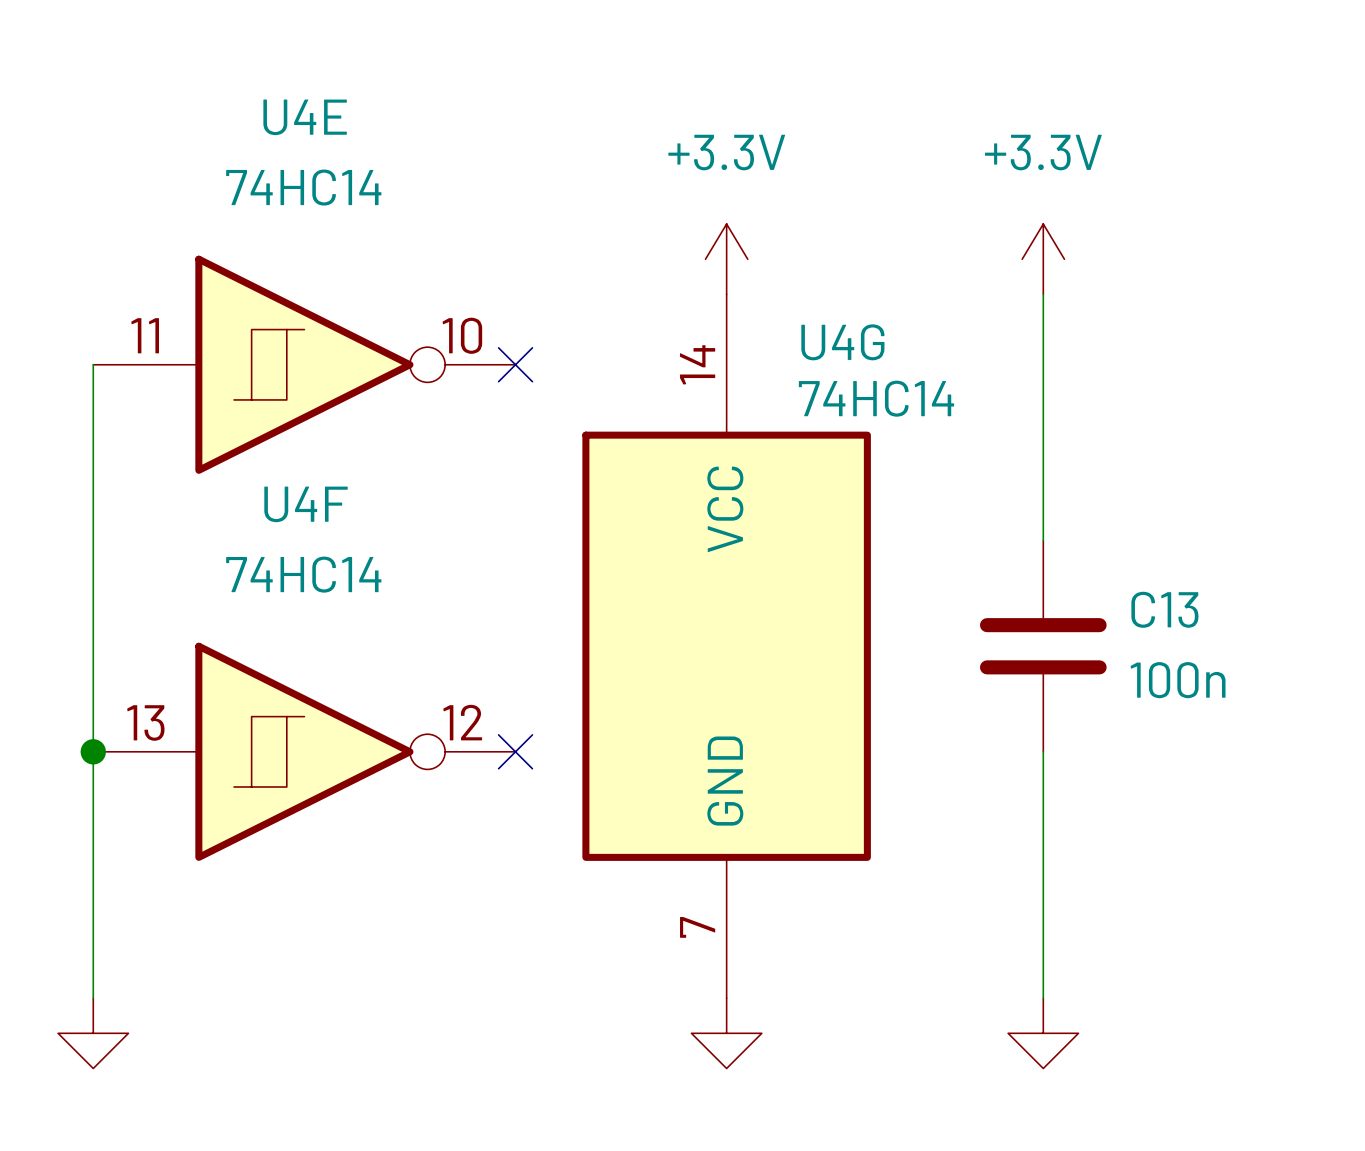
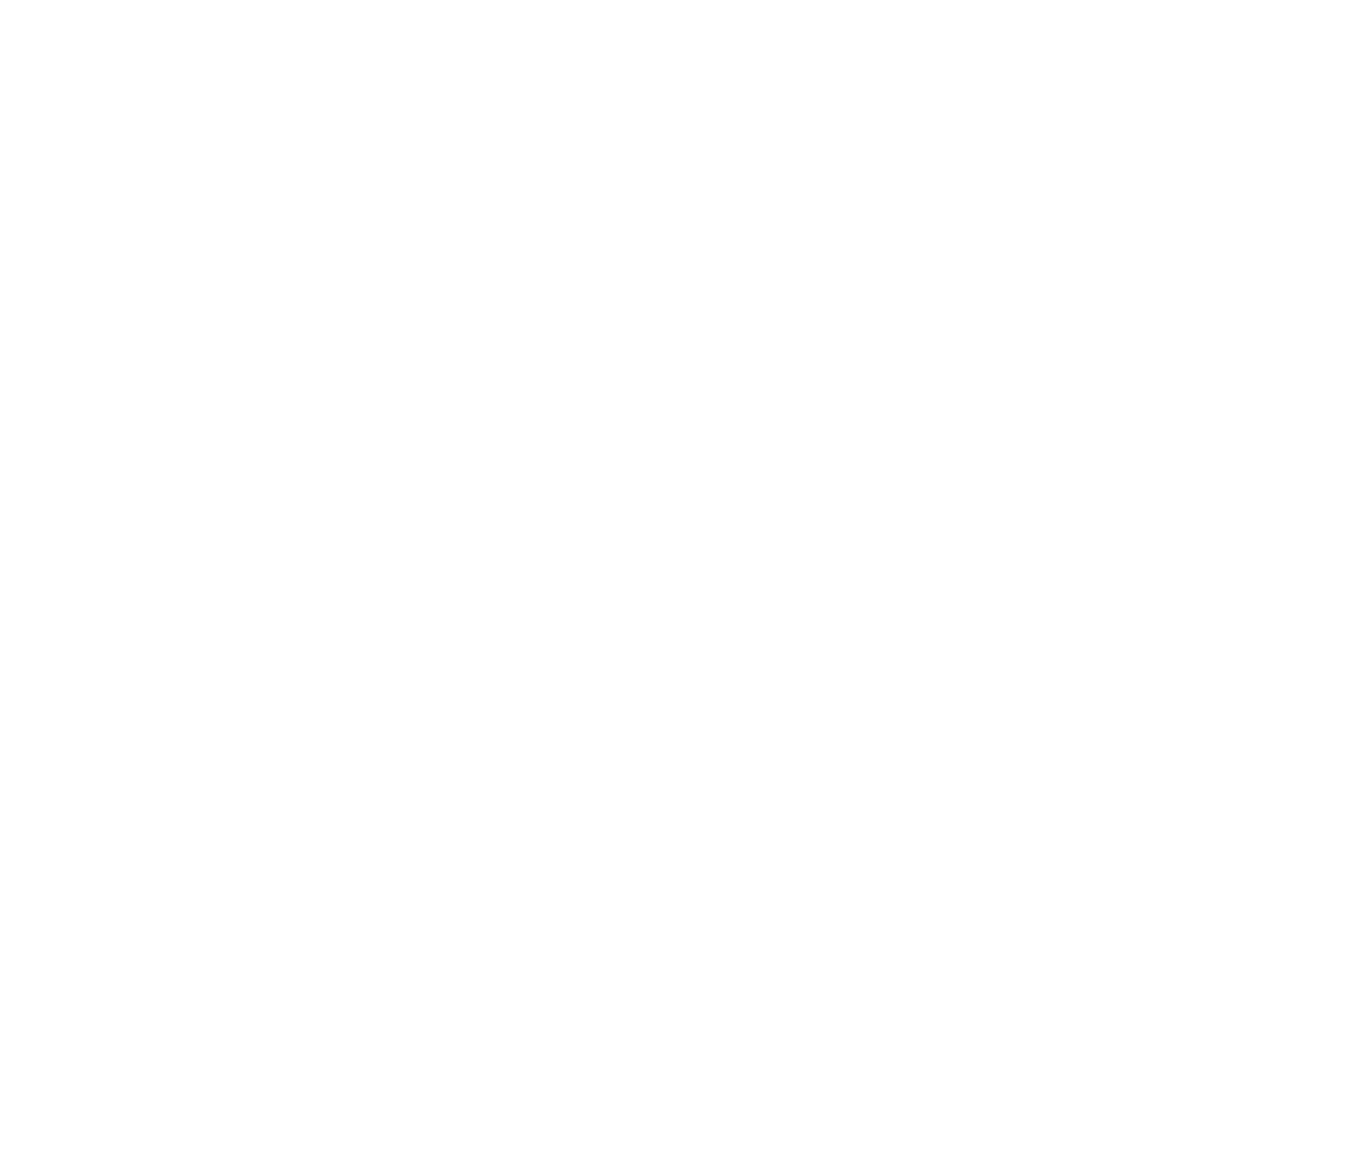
power symbol: +3.3V (726, 259) -> none
power symbol: +3.3V (1043, 259) -> none
wire: (1043, 294) (1043, 540) -> none
wire: (93, 364) (93, 998) -> none
U4E: 74HC14 (304, 364) -> none
no-connect mark: (515, 364) -> none
U4G: 74HC14 (726, 646) -> none
C13: 100n (1043, 646) -> none
junction: (93, 751) -> none
U4F: 74HC14 (304, 751) -> none
no-connect mark: (515, 751) -> none
wire: (1043, 751) (1043, 998) -> none
power symbol: (93, 1033) -> none
power symbol: (726, 1033) -> none
power symbol: (1043, 1033) -> none

